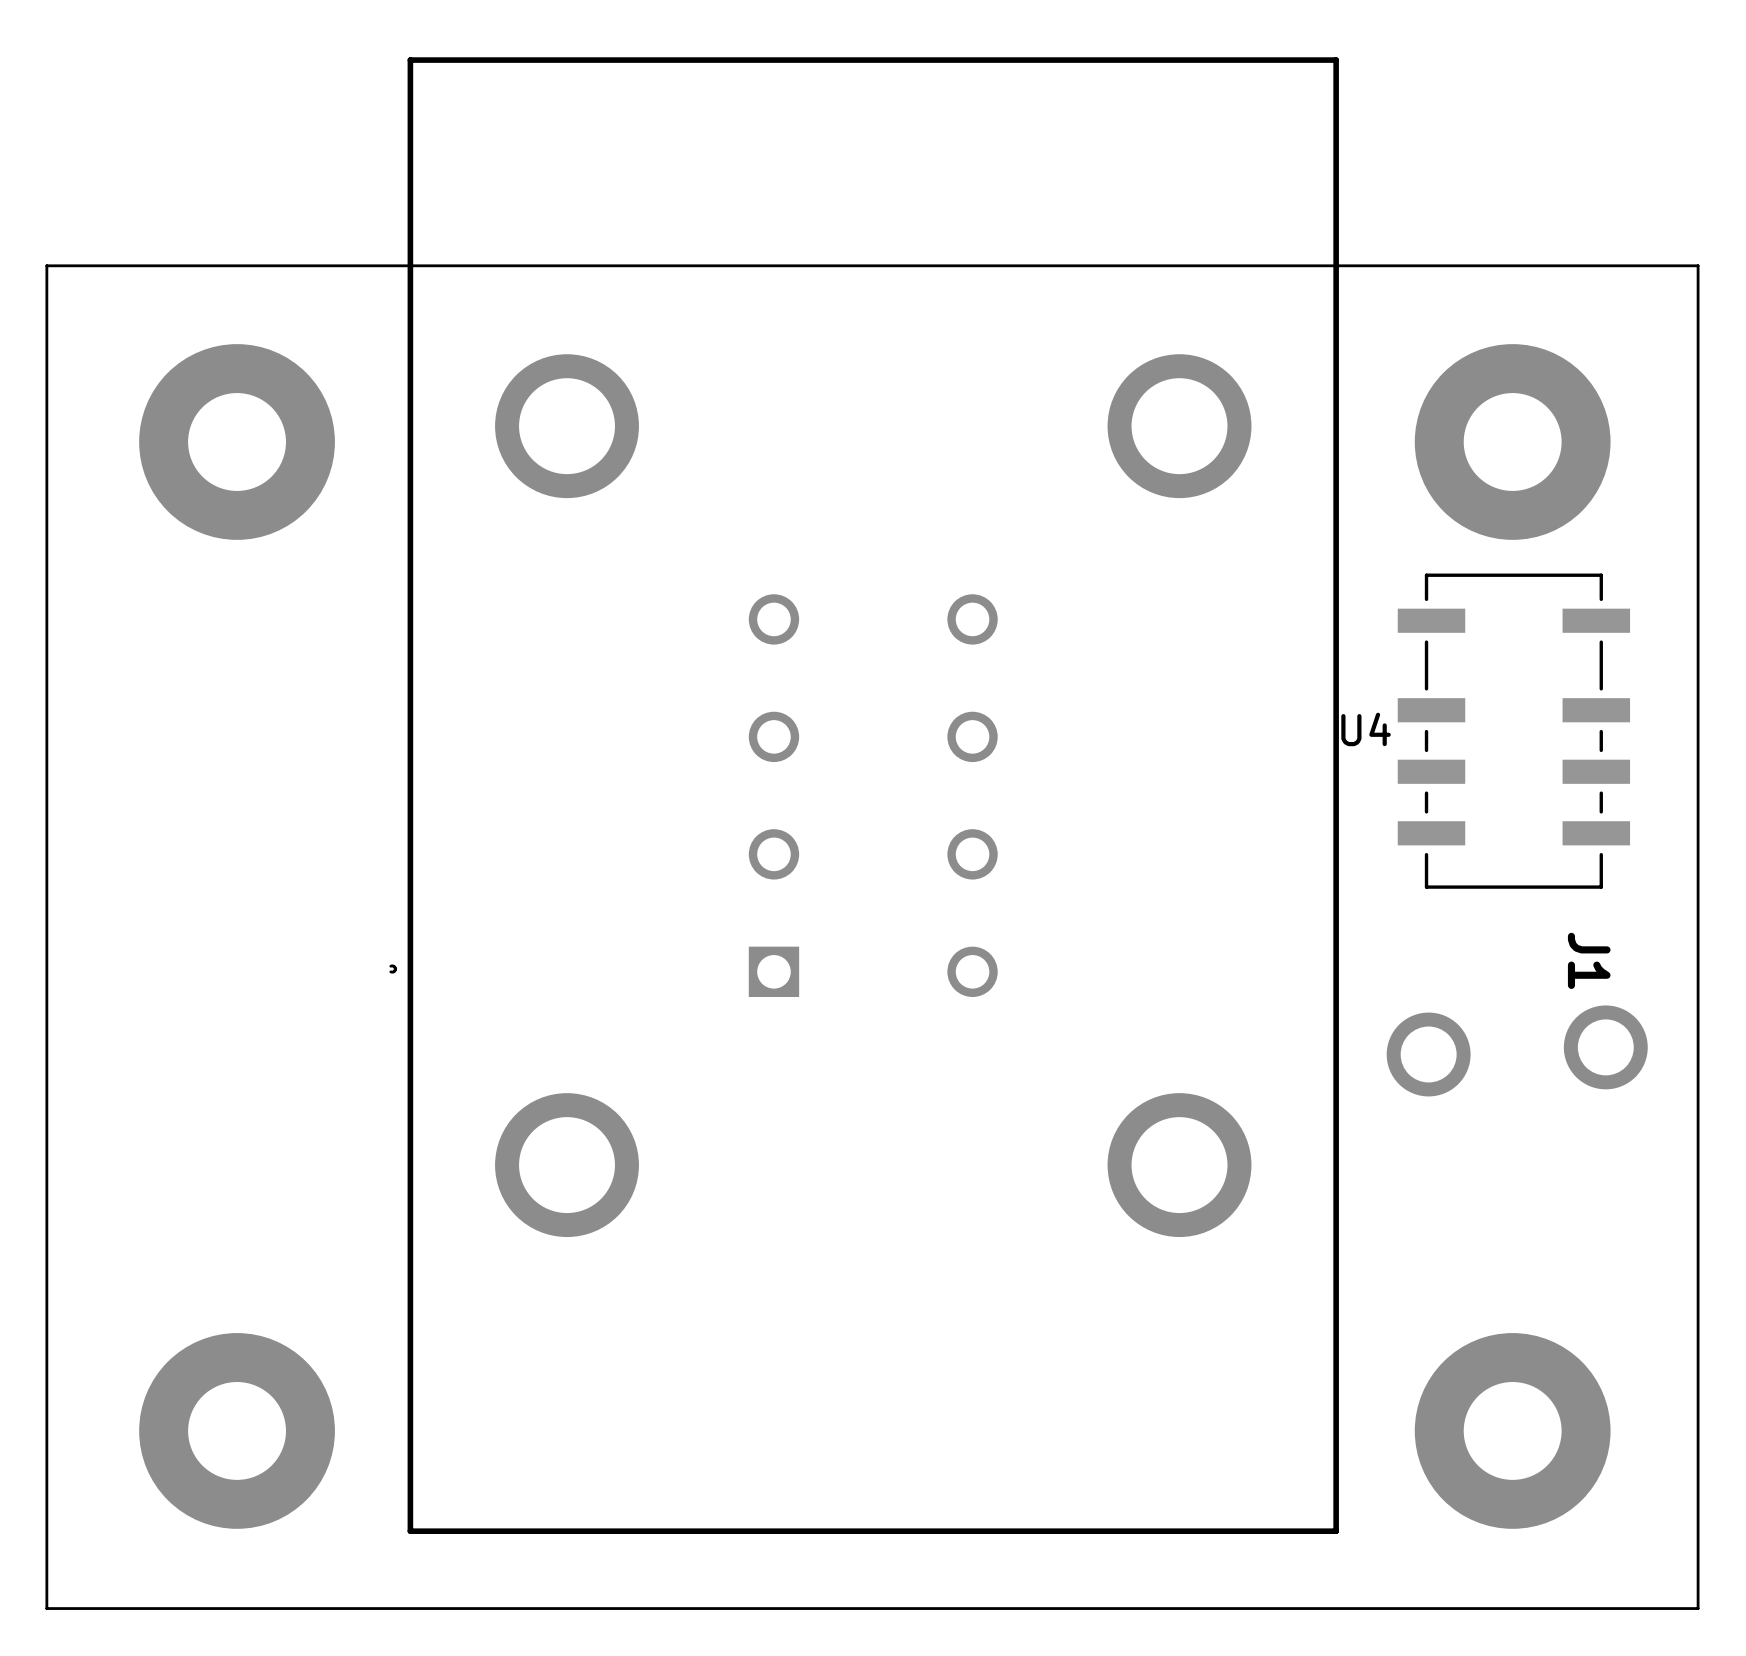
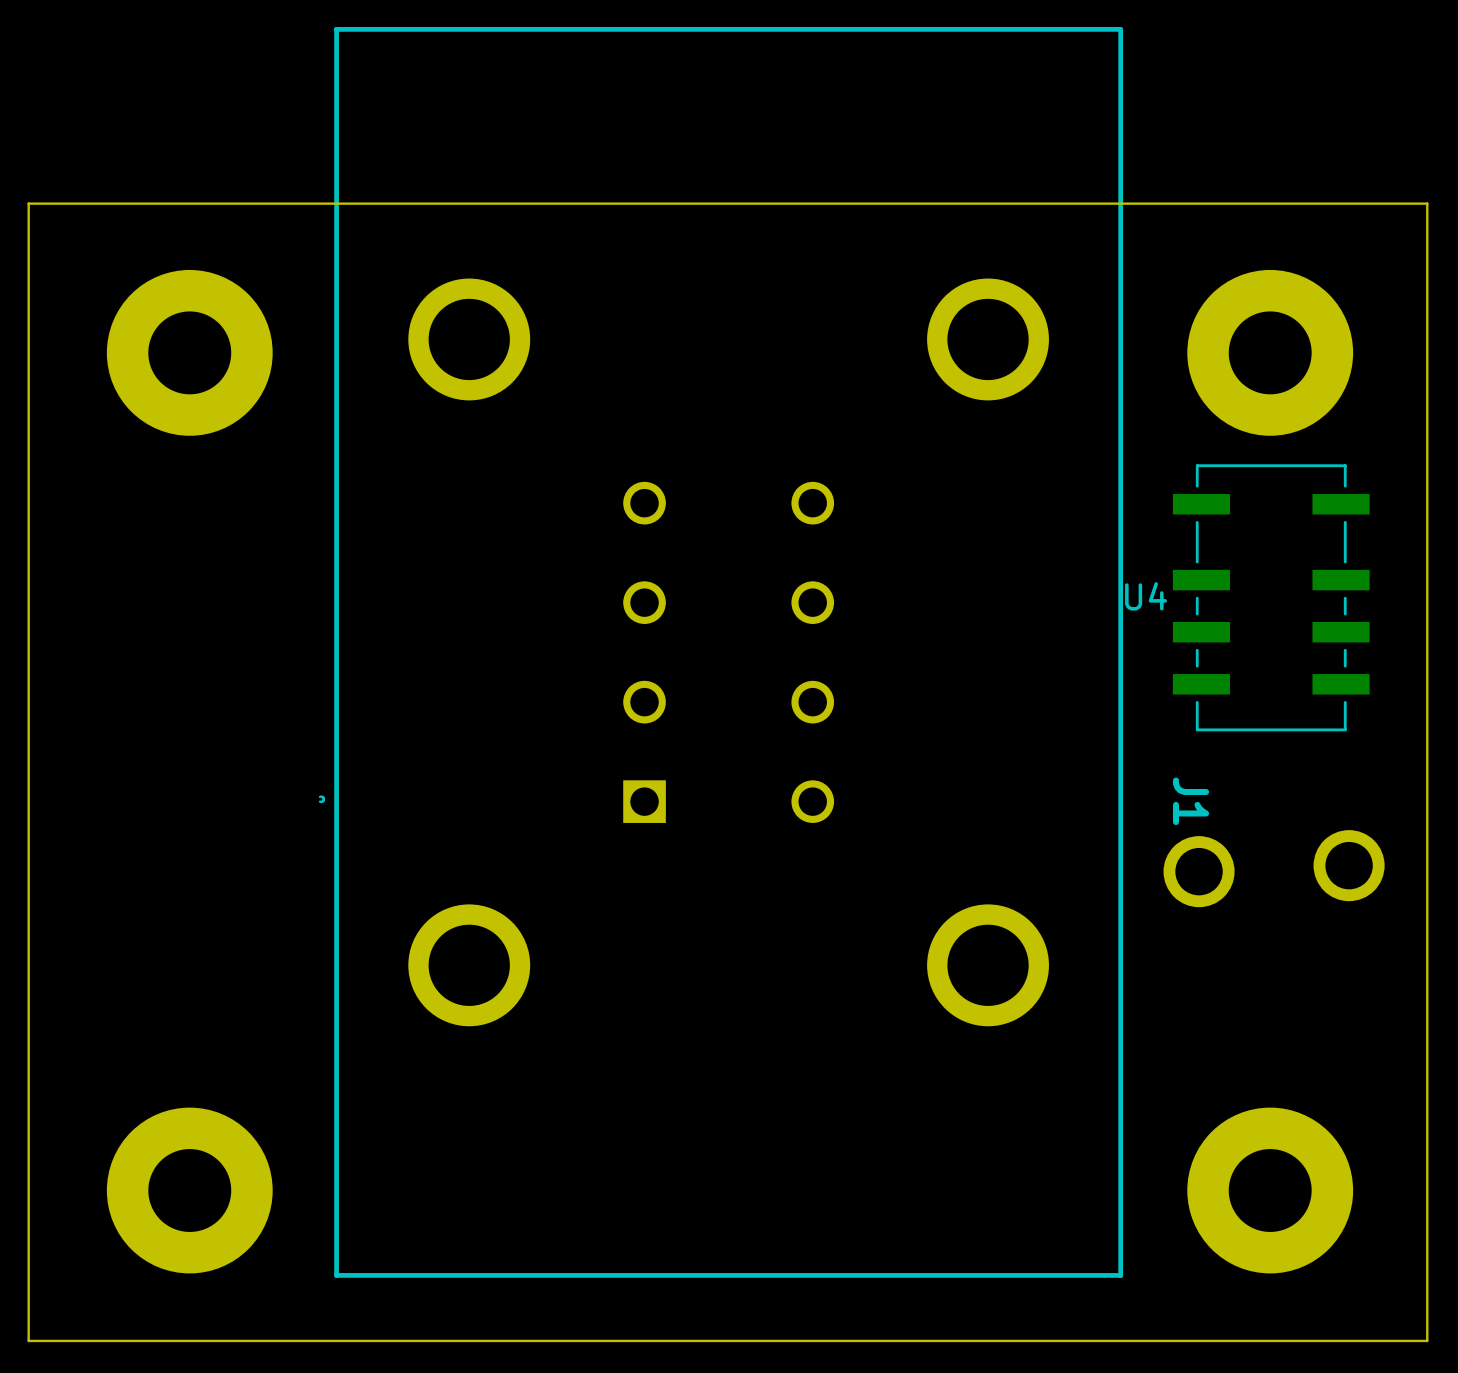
J1 name position: J1 (1589, 960) -> J1 (1191, 801)

